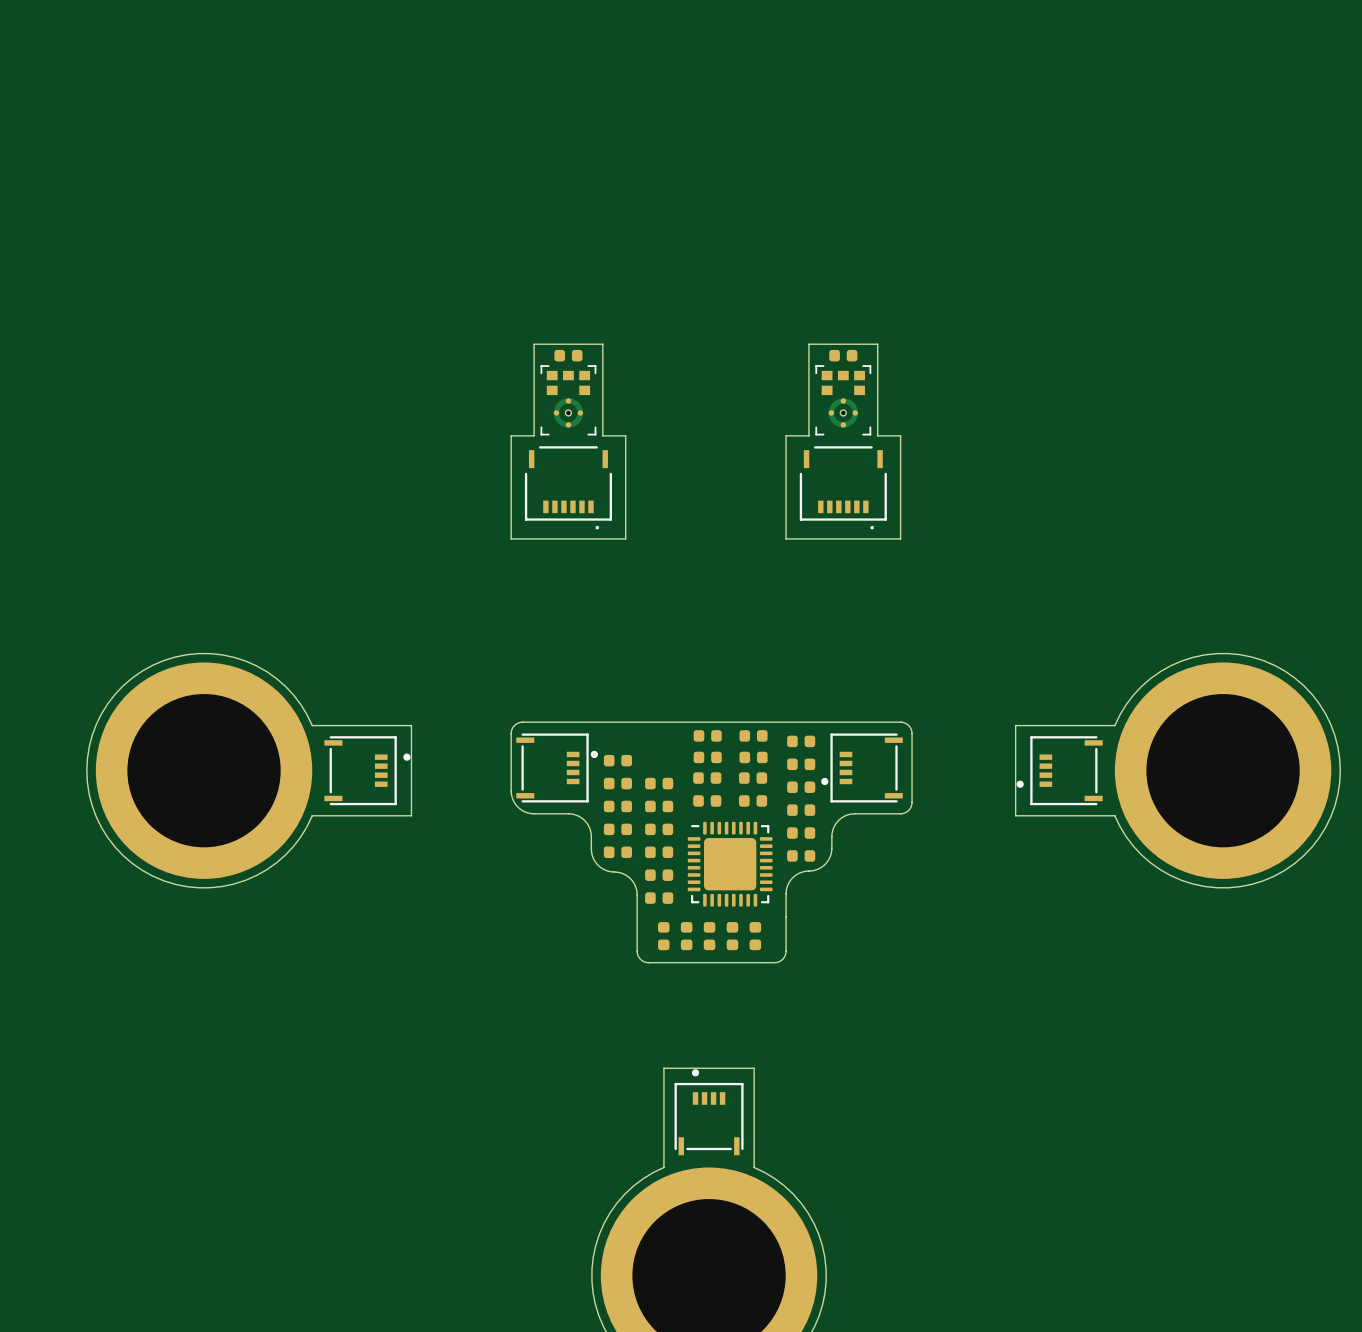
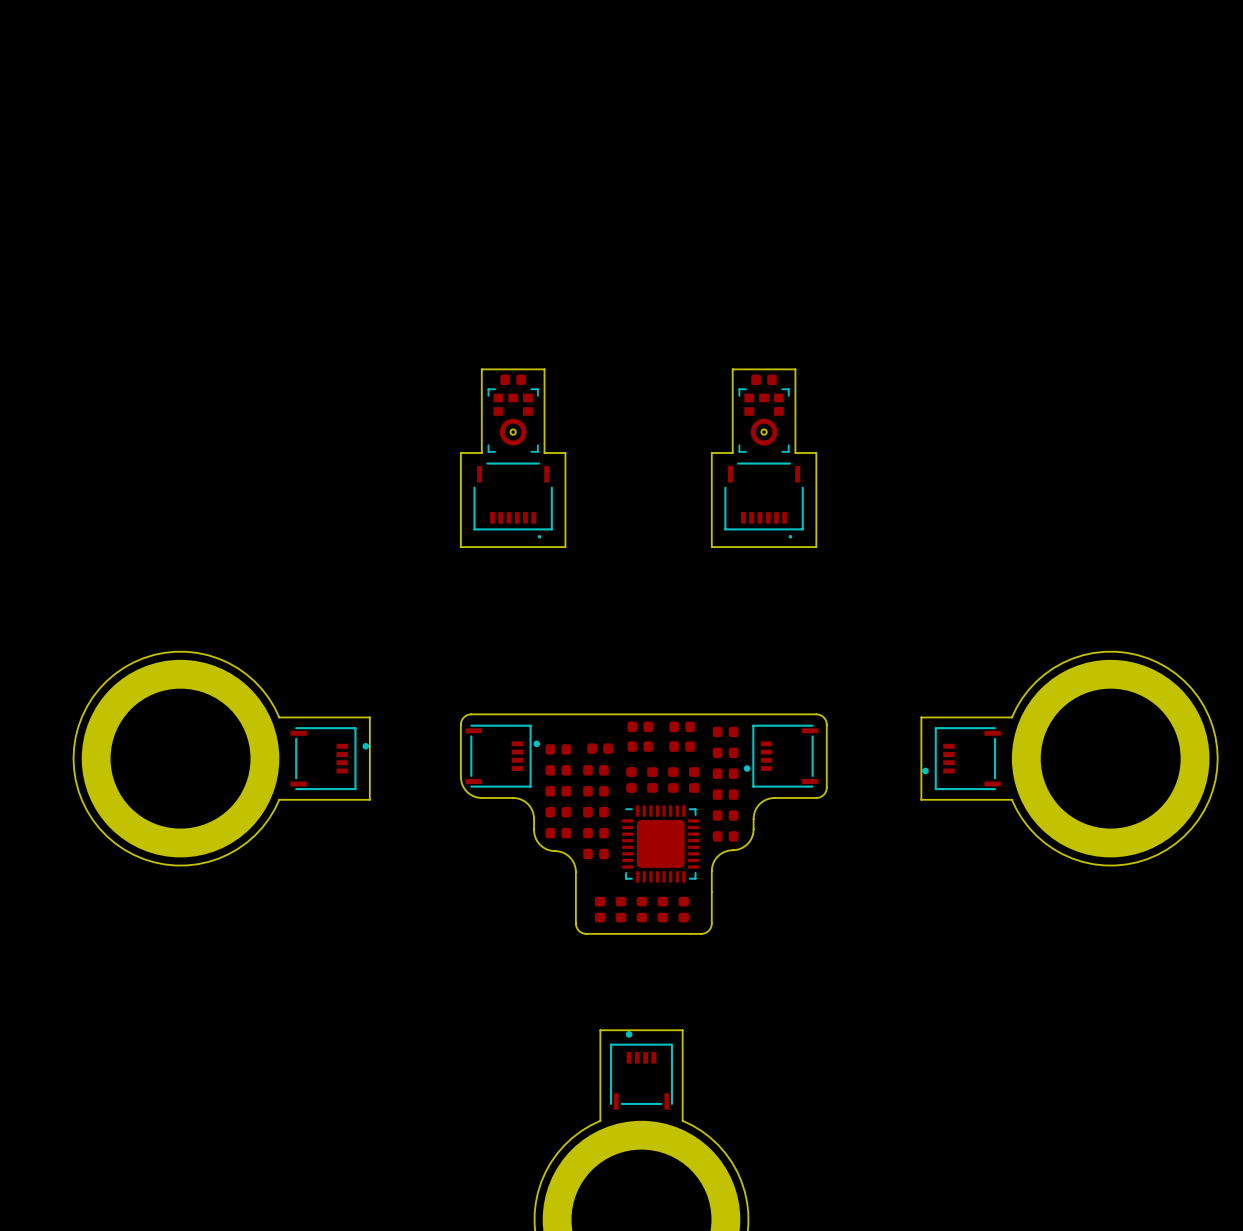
part: none -> (600, 748)
part: (707, 778) -> none
part: (753, 778) -> none
part: none -> (631, 779)
part: none -> (652, 779)
part: none -> (673, 779)
part: none -> (694, 779)
part: (707, 800) -> none
part: (753, 800) -> none
part: (659, 898) -> none

